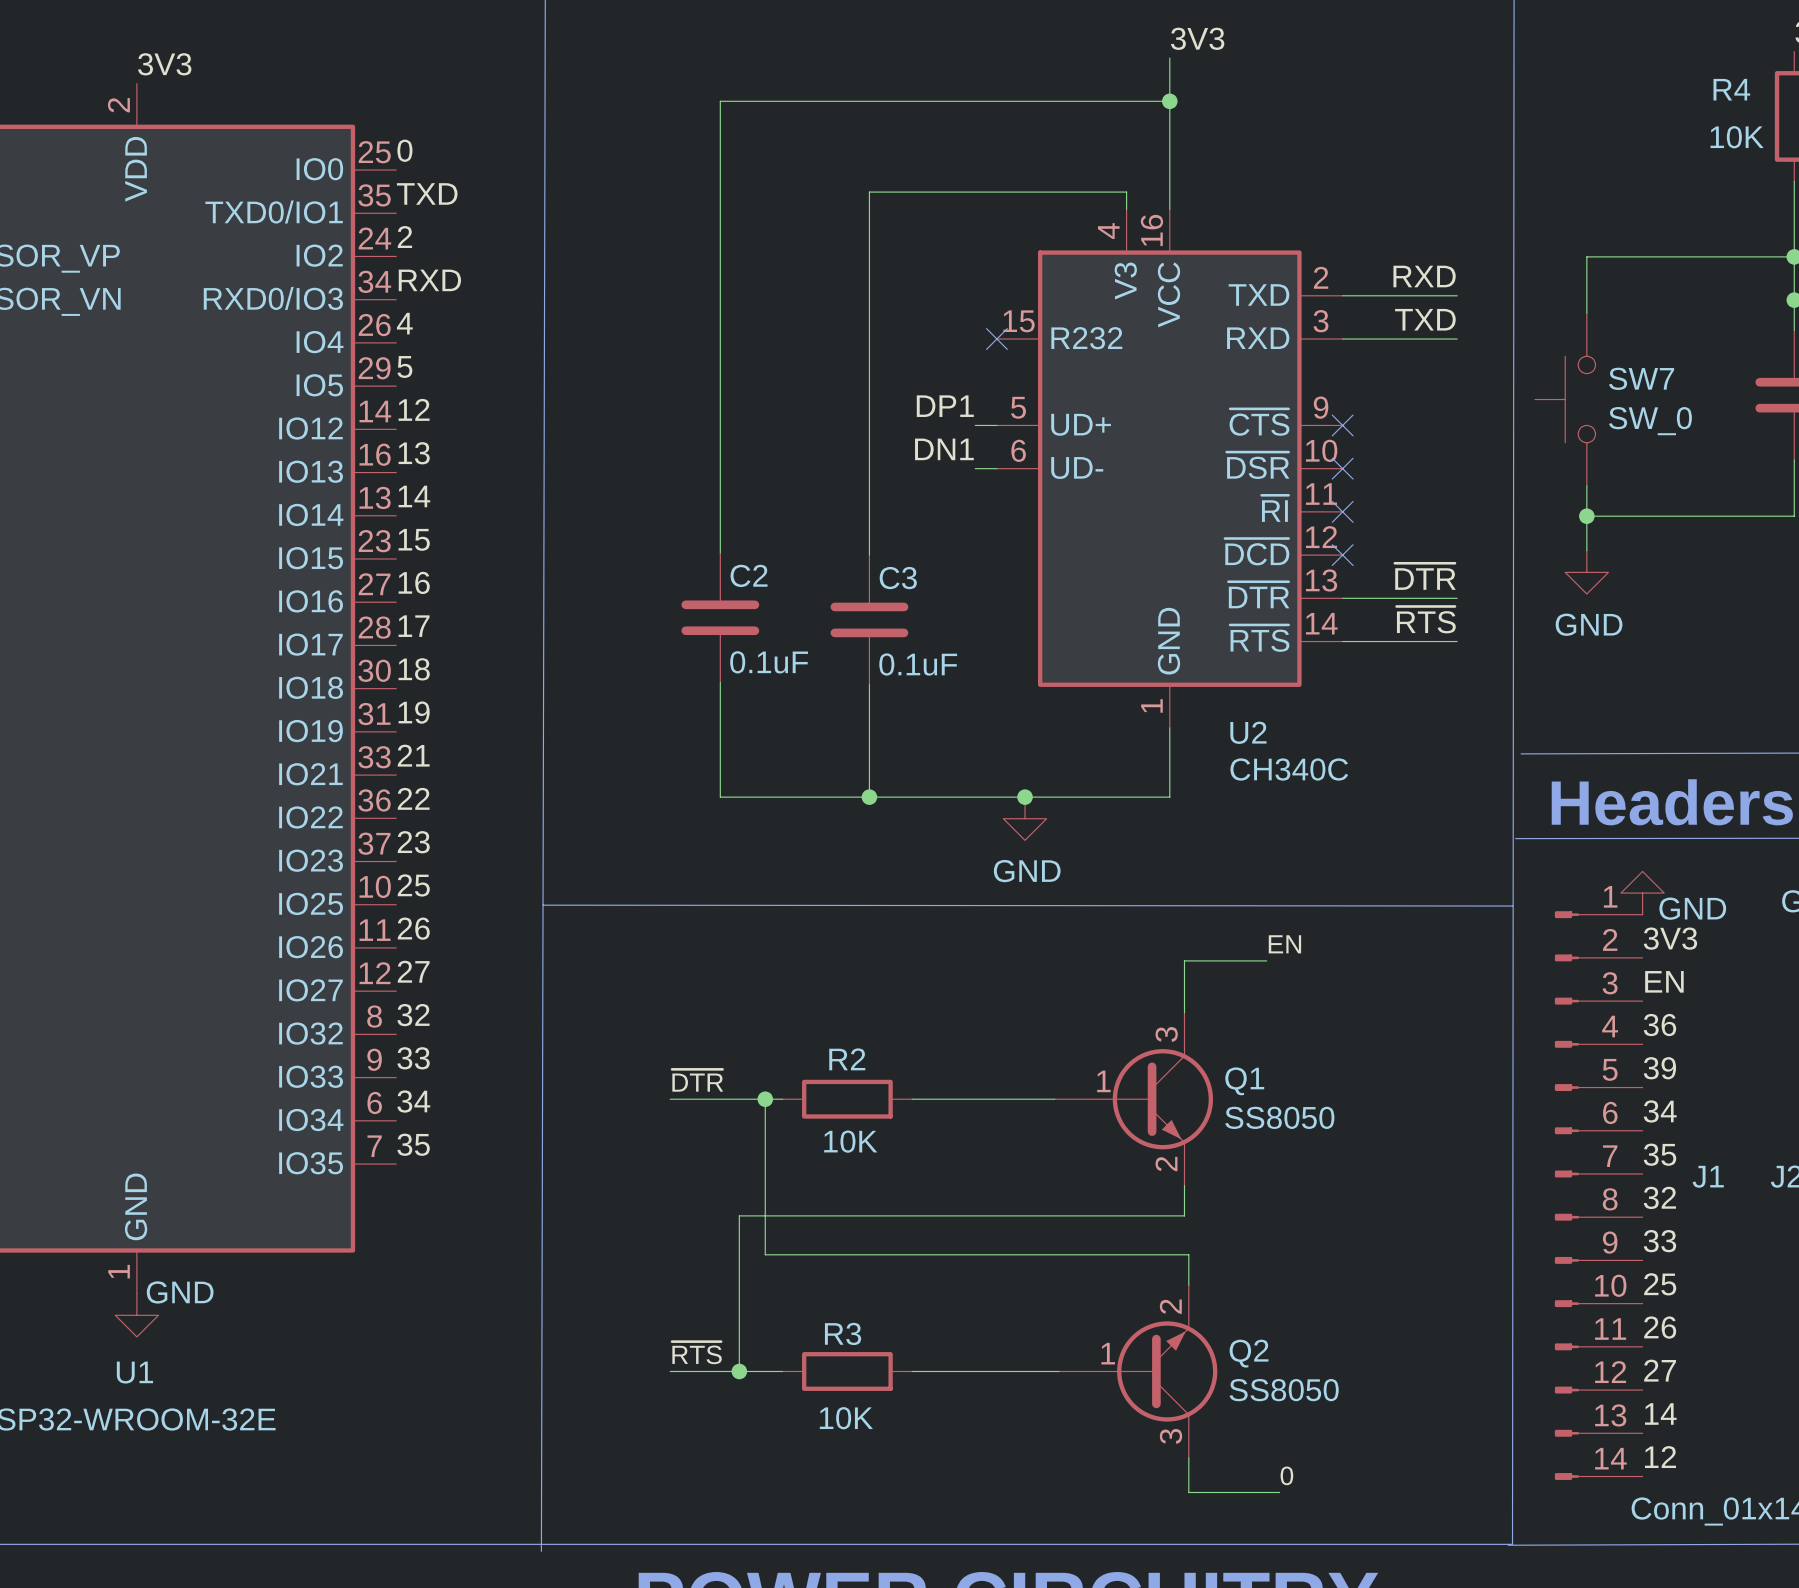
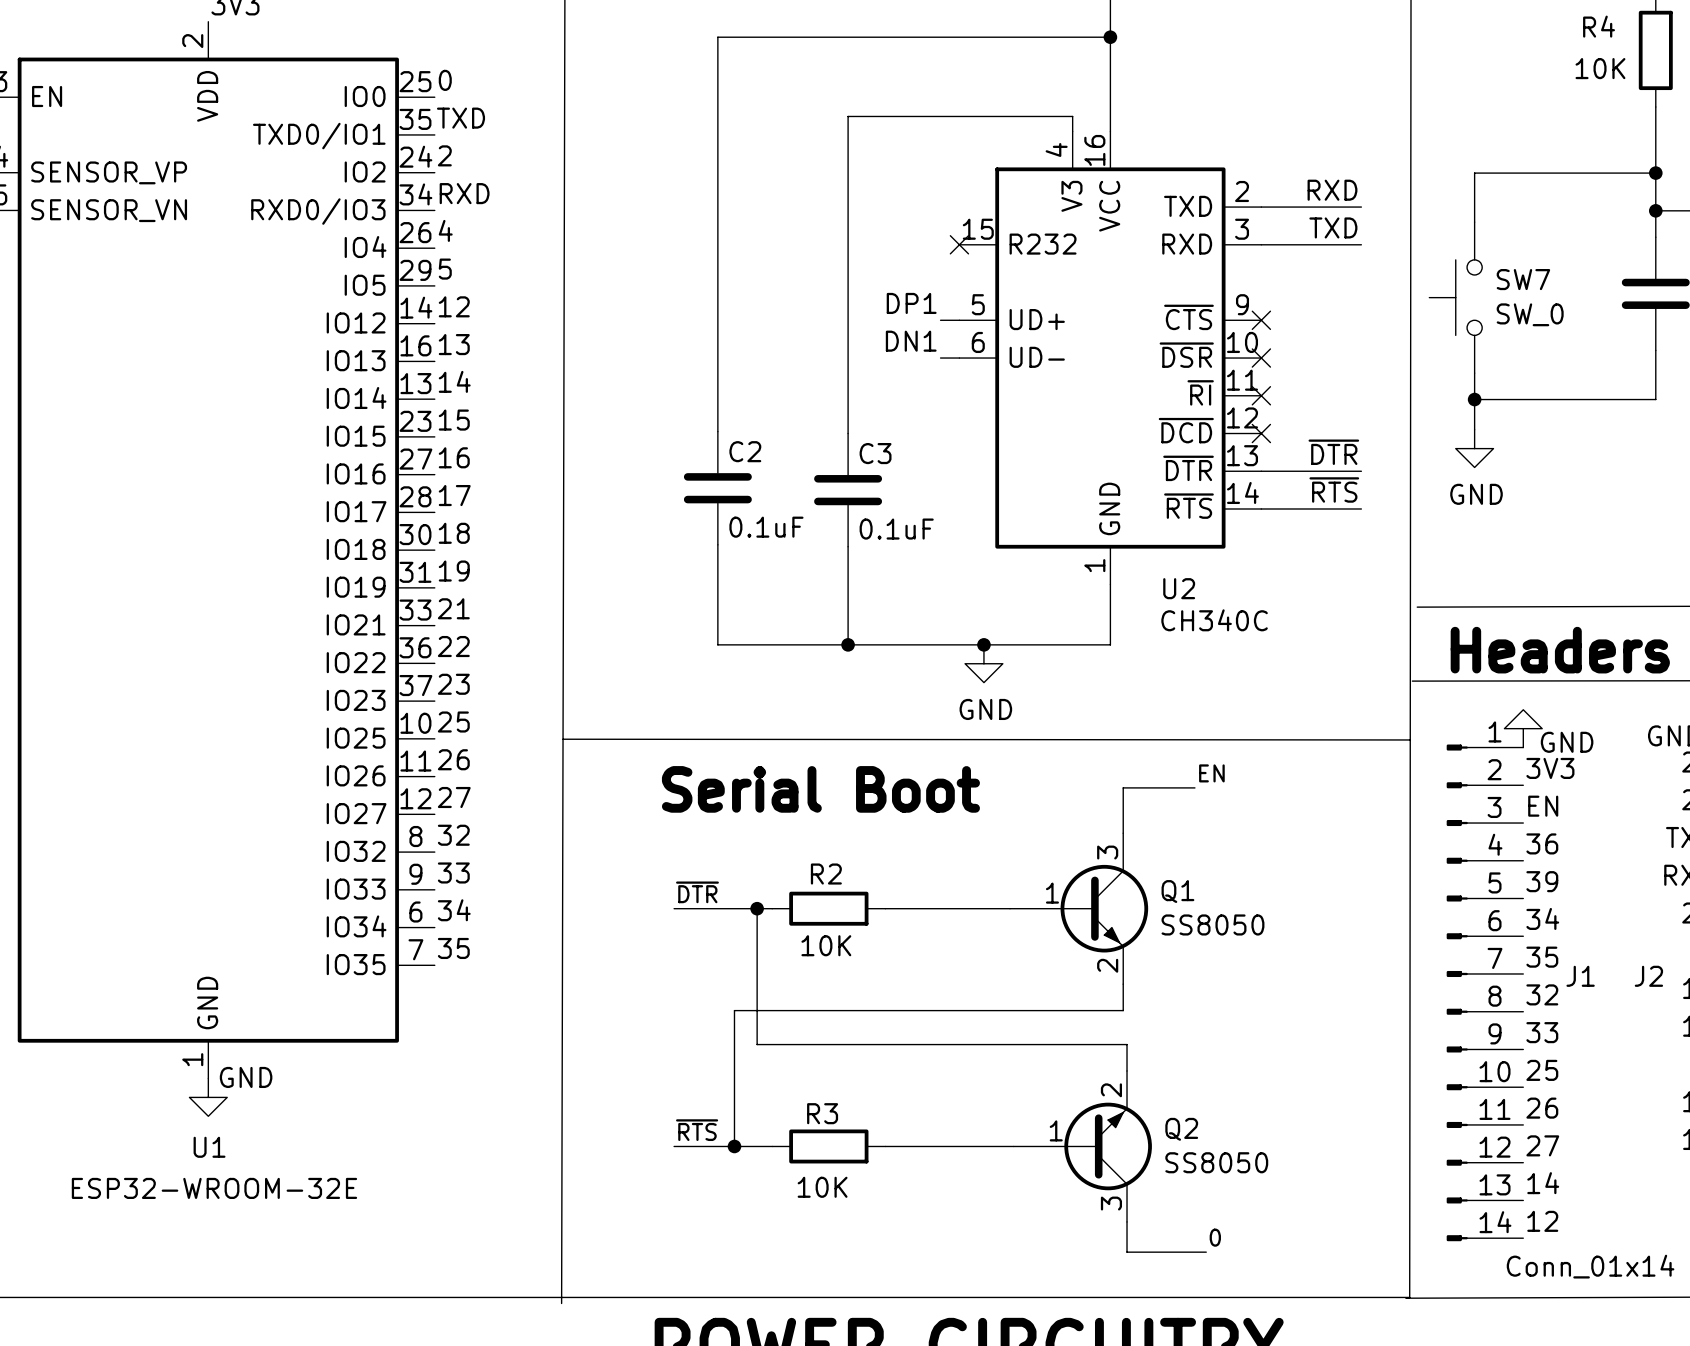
text: none -> Serial Boot (820, 789)

